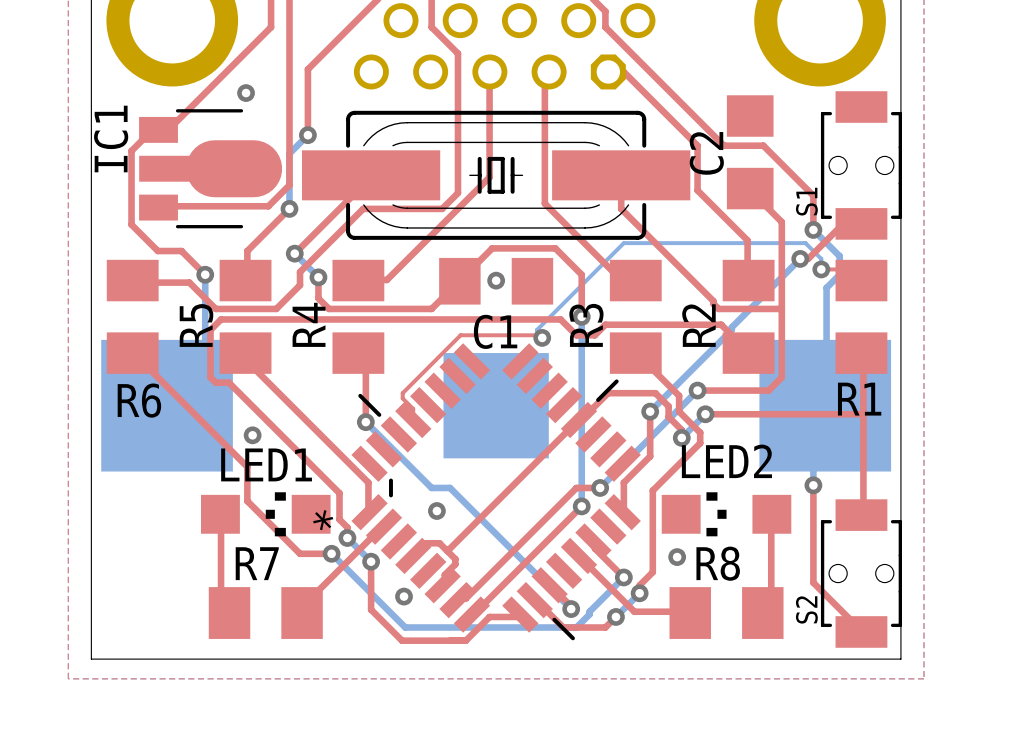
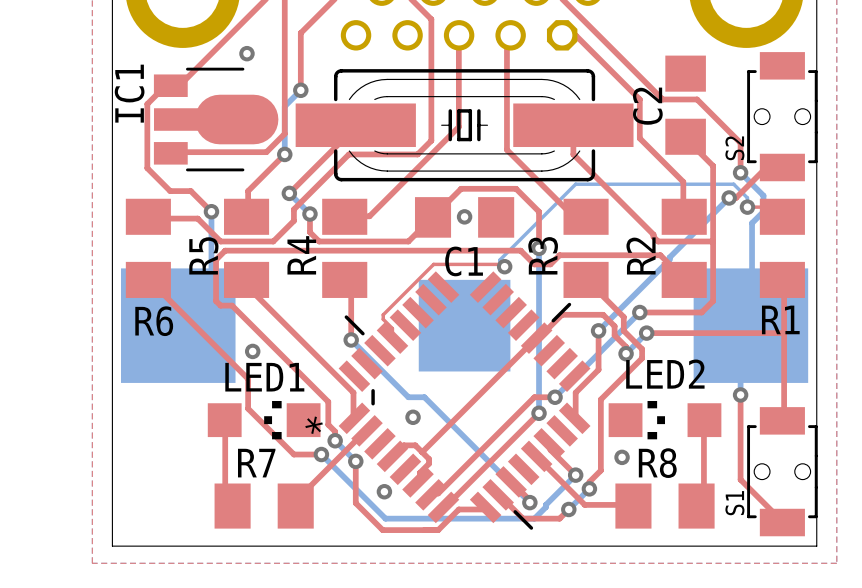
S1 name: S1 (806, 201) -> S2 (734, 148)
S2 name: S2 (806, 609) -> S1 (734, 503)

